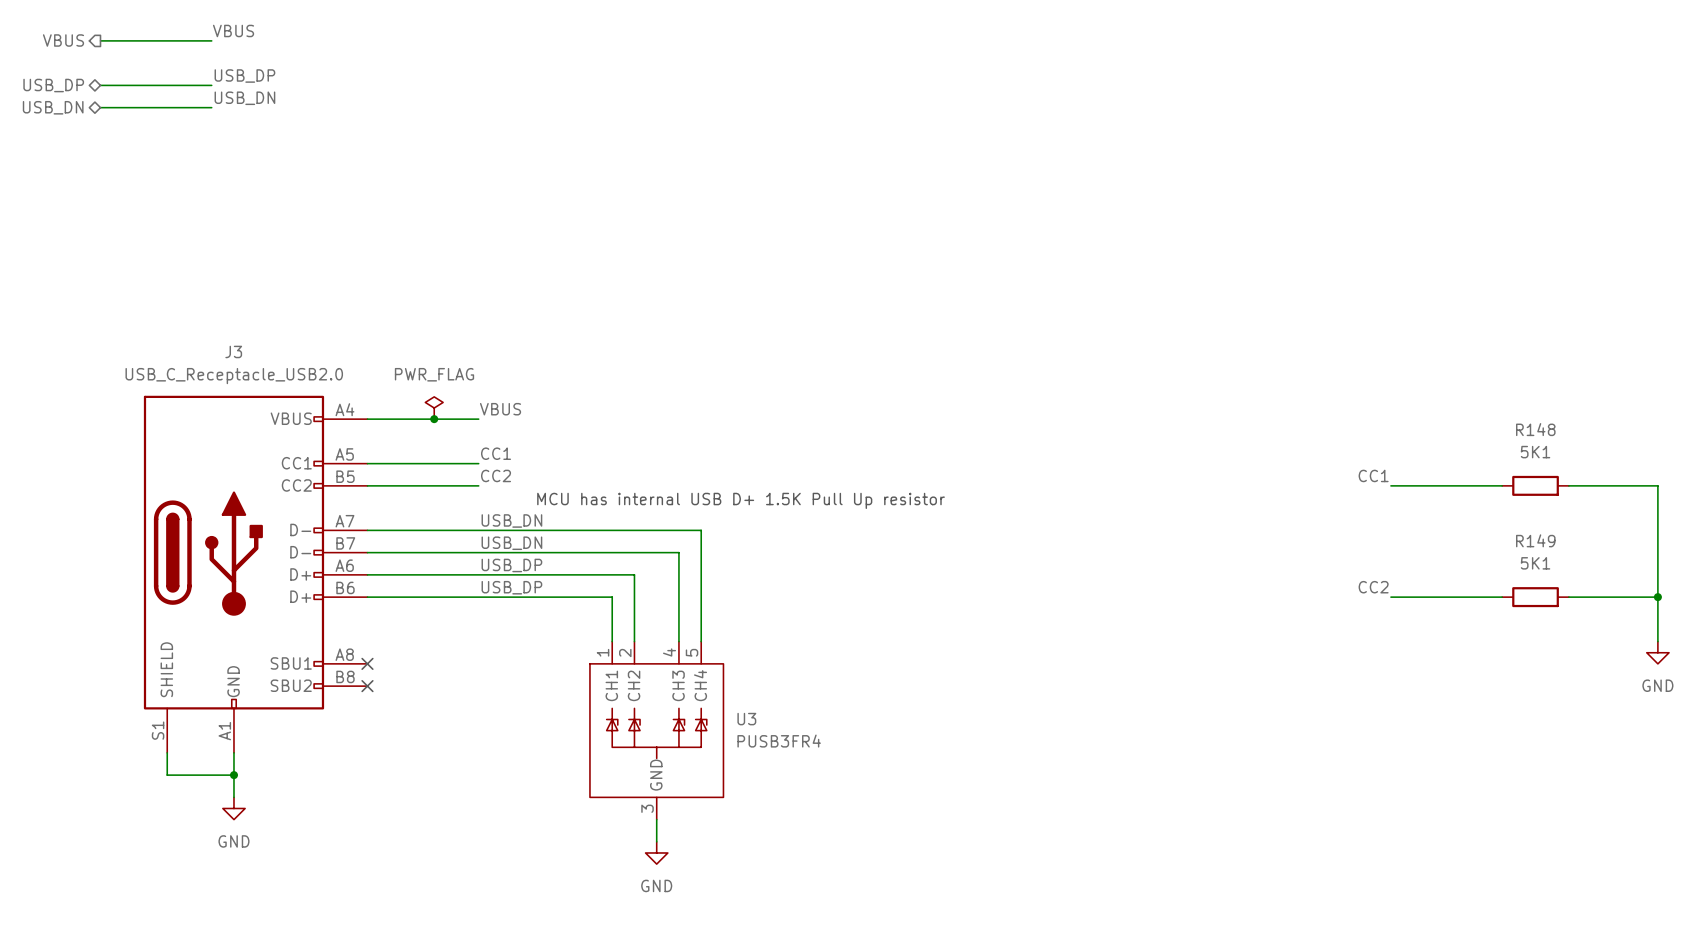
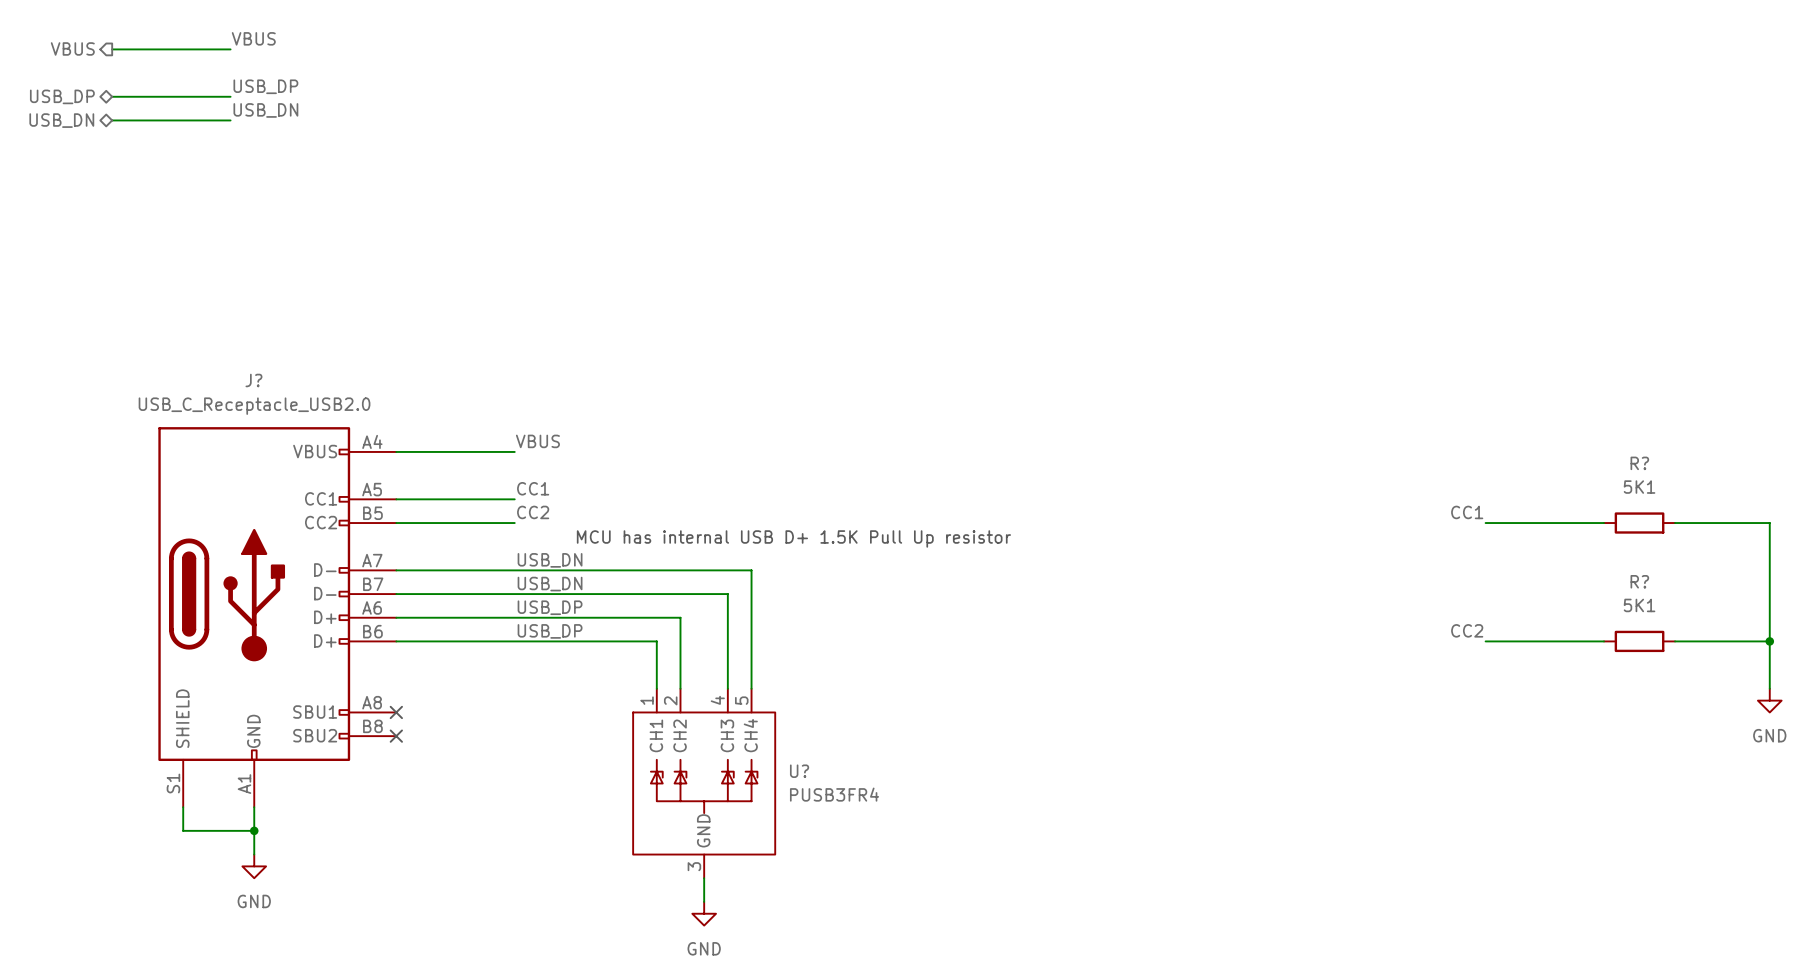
J3 name: J3 (233, 351) -> J? (253, 380)
power symbol: PWR_FLAG (434, 408) -> none
junction: (434, 419) -> none
R148 name: R148 (1535, 429) -> R? (1639, 463)
R149 name: R149 (1535, 540) -> R? (1639, 581)
U3 name: U3 (746, 719) -> U? (799, 771)

